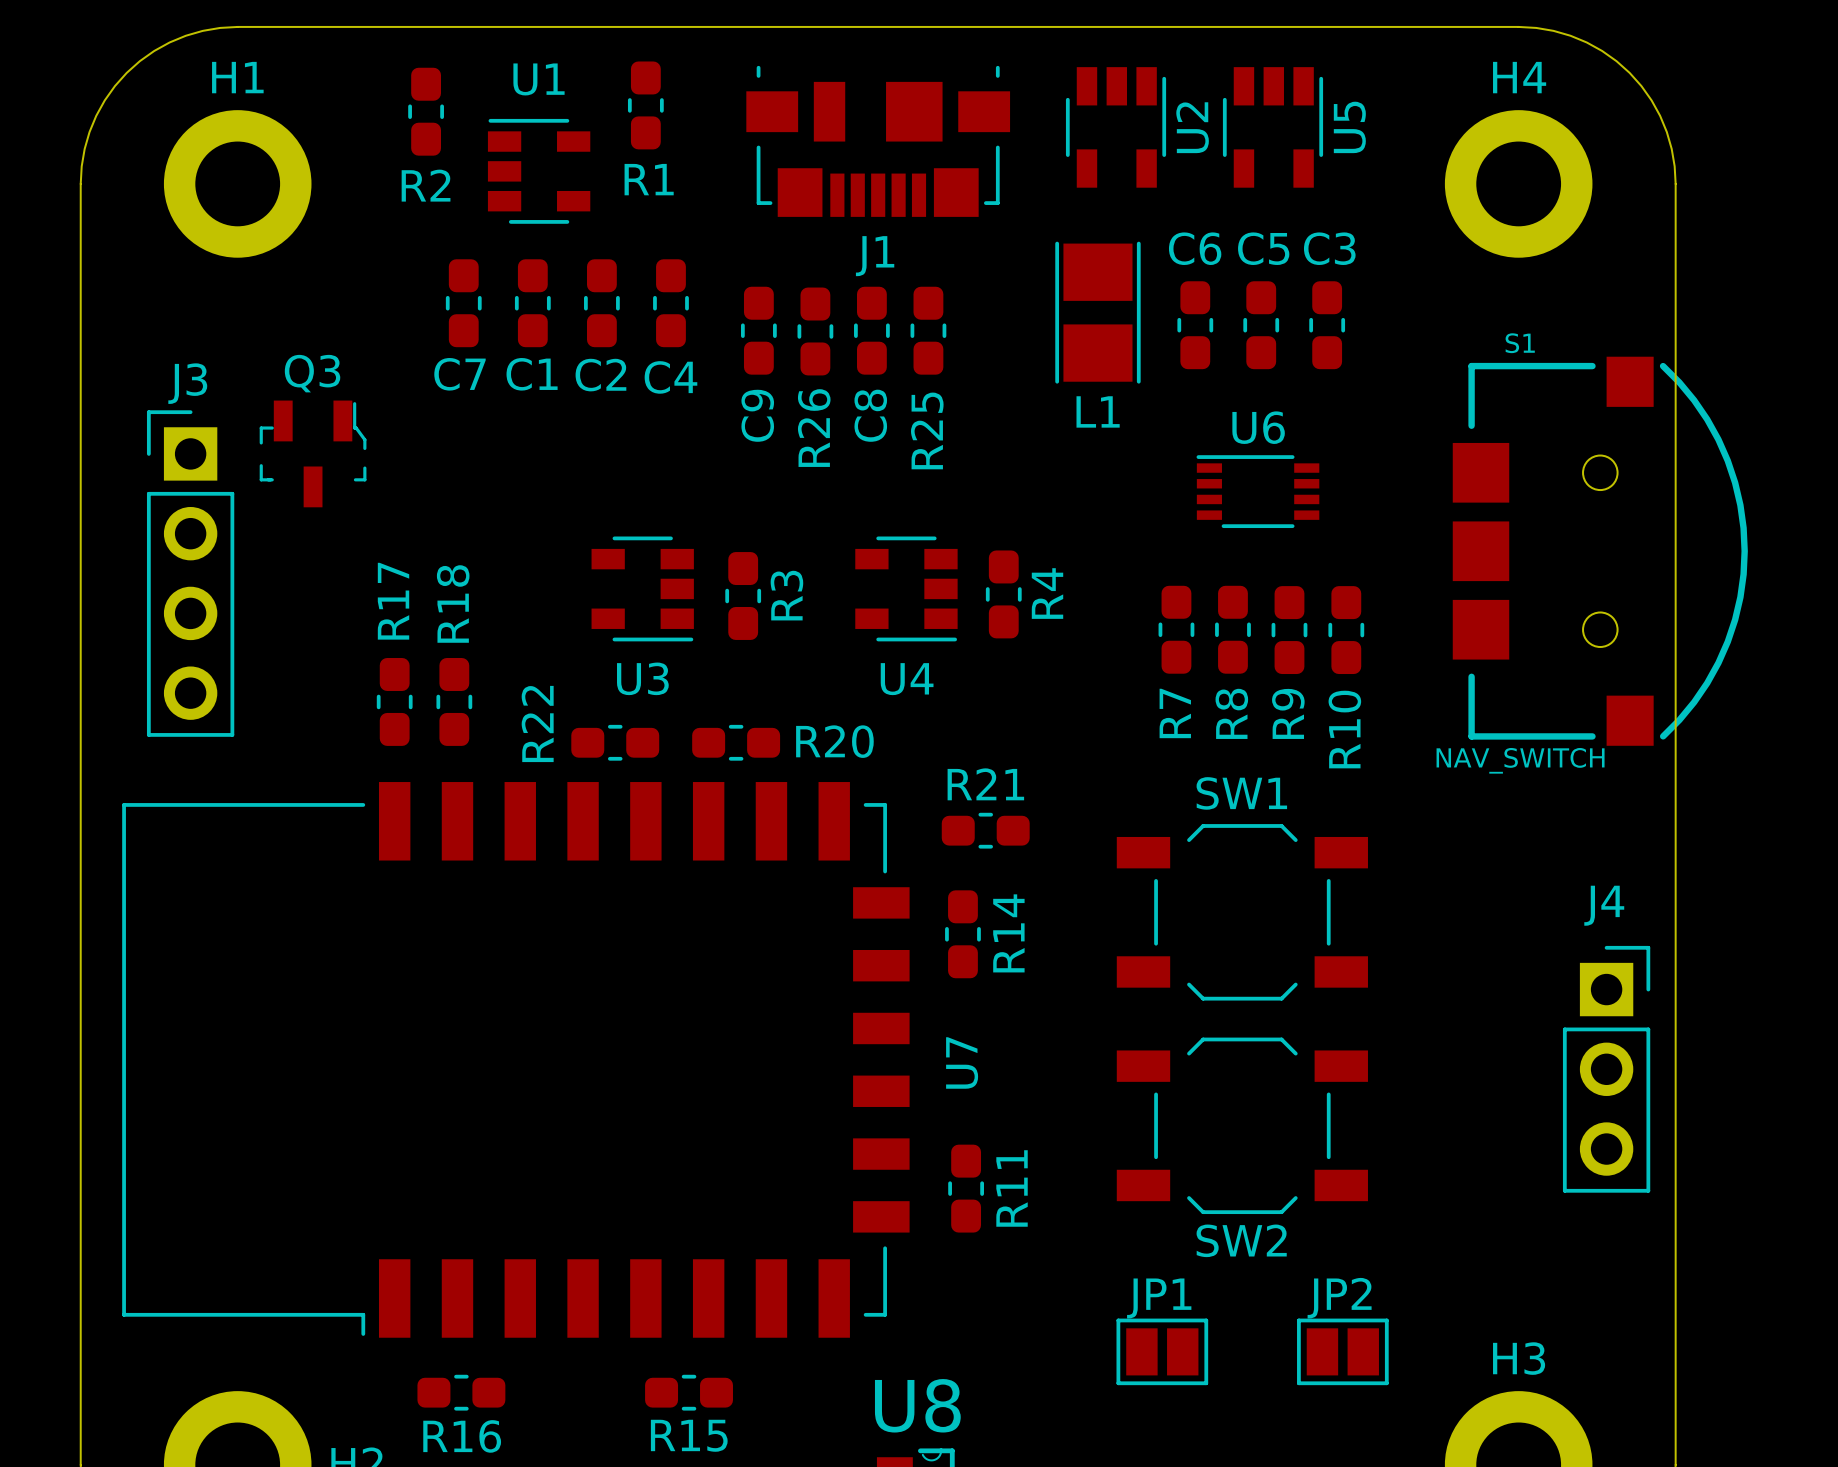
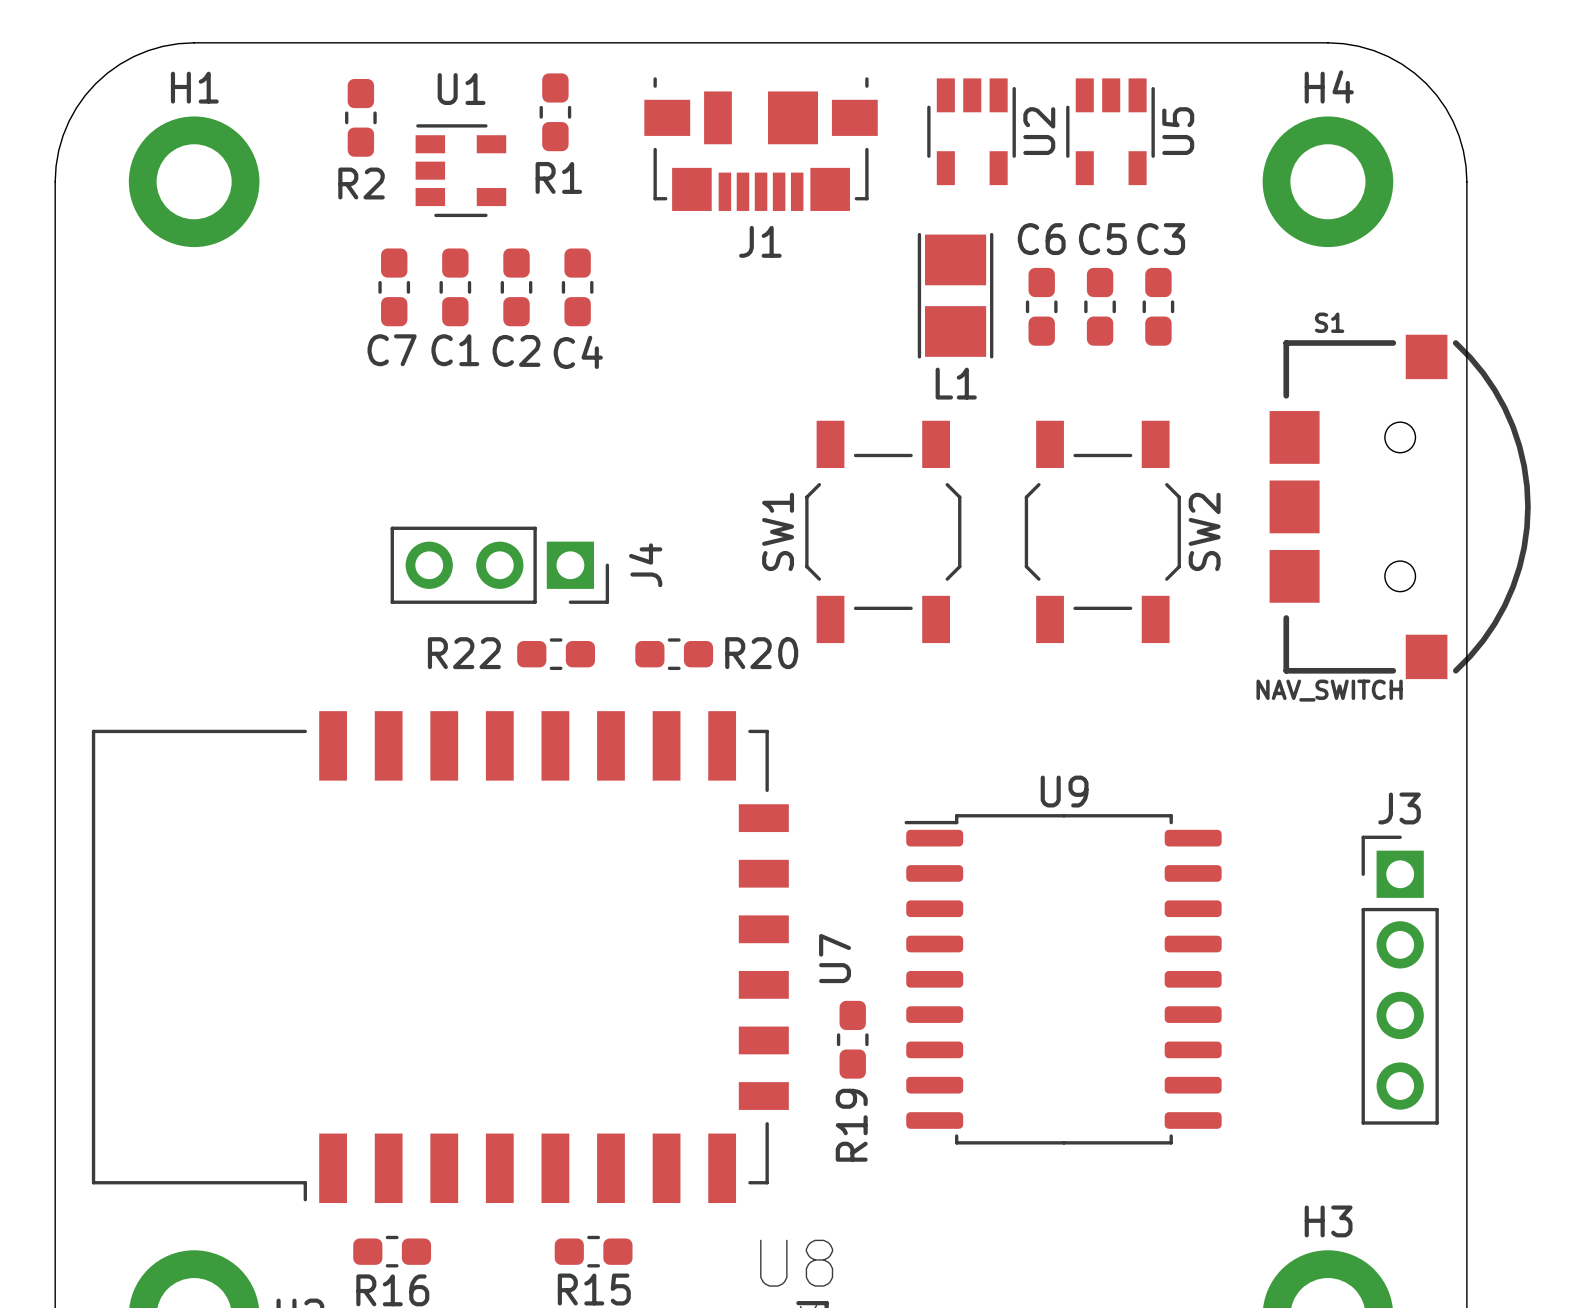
C9: (758, 330) -> none
C8: (871, 330) -> none
R25: (928, 330) -> none
R26: (815, 331) -> none
Q3: (313, 453) -> none
U6: (1257, 491) -> none
J3 position: (190, 573) -> (1400, 980)
U3: (642, 588) -> none
U4: (906, 588) -> none
R4: (1003, 594) -> none
R3: (743, 596) -> none
R7: (1176, 629) -> none
R8: (1232, 629) -> none
R9: (1289, 630) -> none
R10: (1346, 630) -> none
R17: (394, 701) -> none
R18: (454, 701) -> none
R22 name rotation: 0° (537, 723) -> 90° clockwise (464, 653)
R22 position: (615, 742) -> (556, 654)
R20 position: (736, 742) -> (674, 654)
SW1 name position: SW1 (1241, 793) -> SW1 (778, 531)
R21: (985, 830) -> none
SW1 rotation: 0° (1242, 912) -> 90° clockwise (883, 531)
SW1 position: (1242, 912) -> (883, 531)
R14: (962, 934) -> none
J4 rotation: 0° (1606, 1069) -> 90° clockwise (499, 565)
J4 position: (1606, 1069) -> (499, 565)
U9: none -> (1063, 979)
SW2 rotation: 0° (1242, 1125) -> 90° clockwise (1102, 531)
SW2 position: (1242, 1125) -> (1102, 531)
R19: none -> (852, 1039)
R11: (966, 1188) -> none
SW2 name position: SW2 (1241, 1240) -> SW2 (1204, 531)
JP1: (1162, 1351) -> none
JP2: (1342, 1351) -> none

